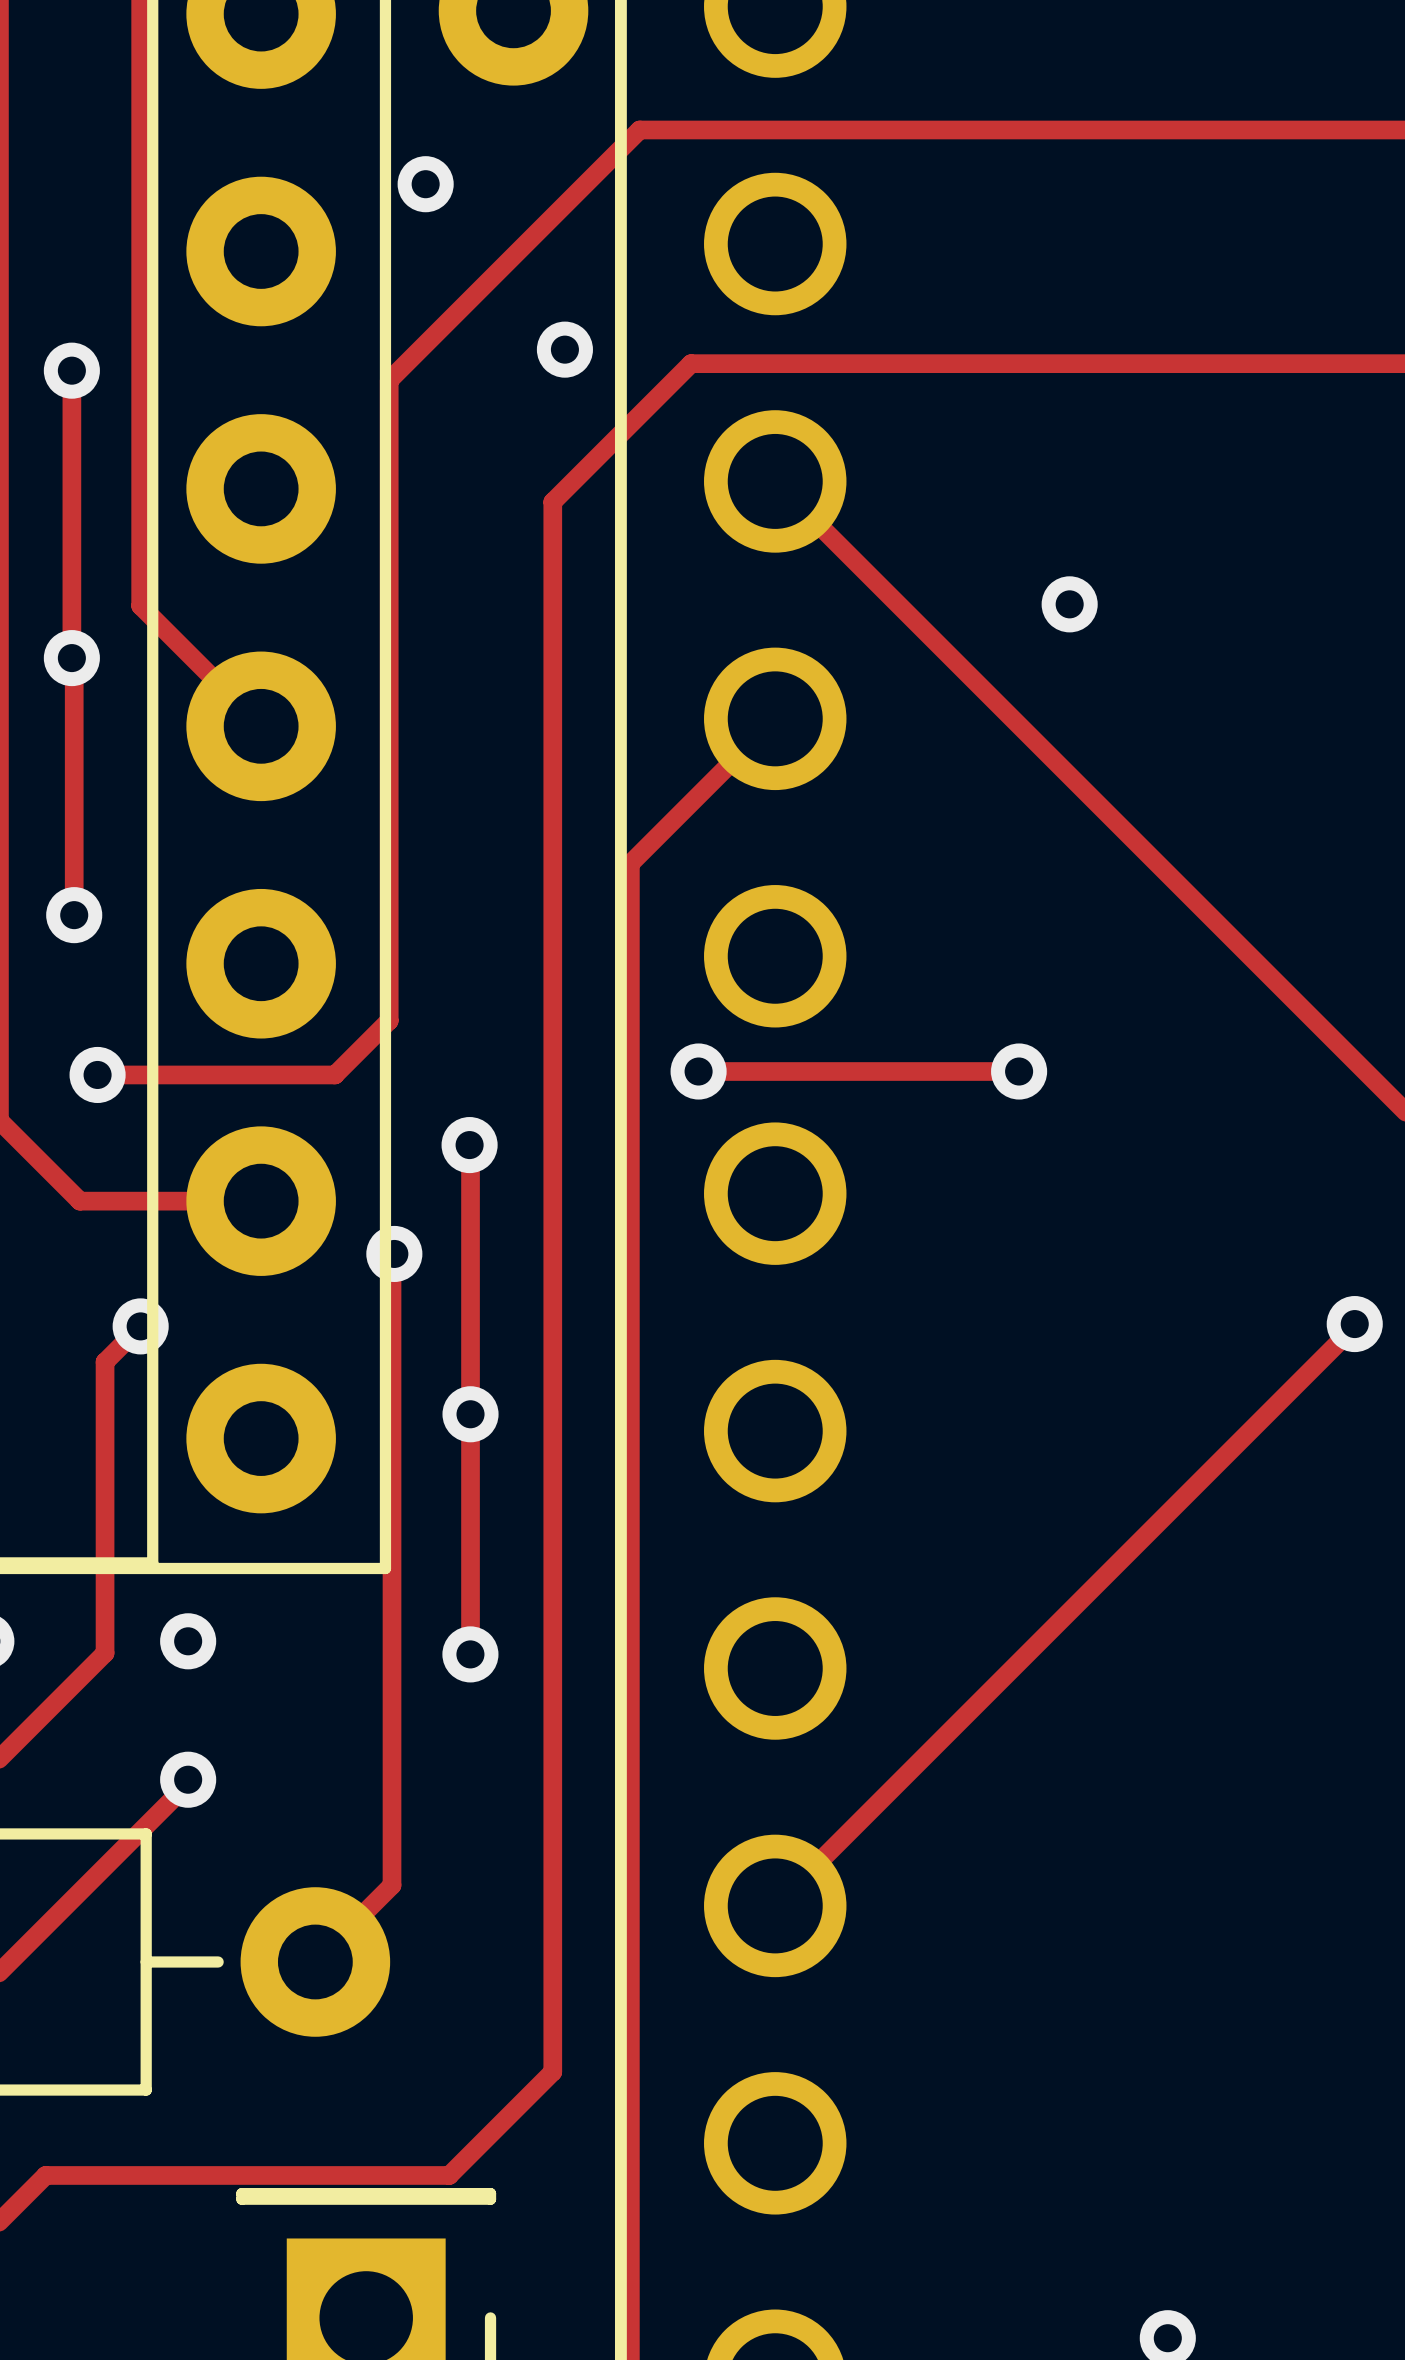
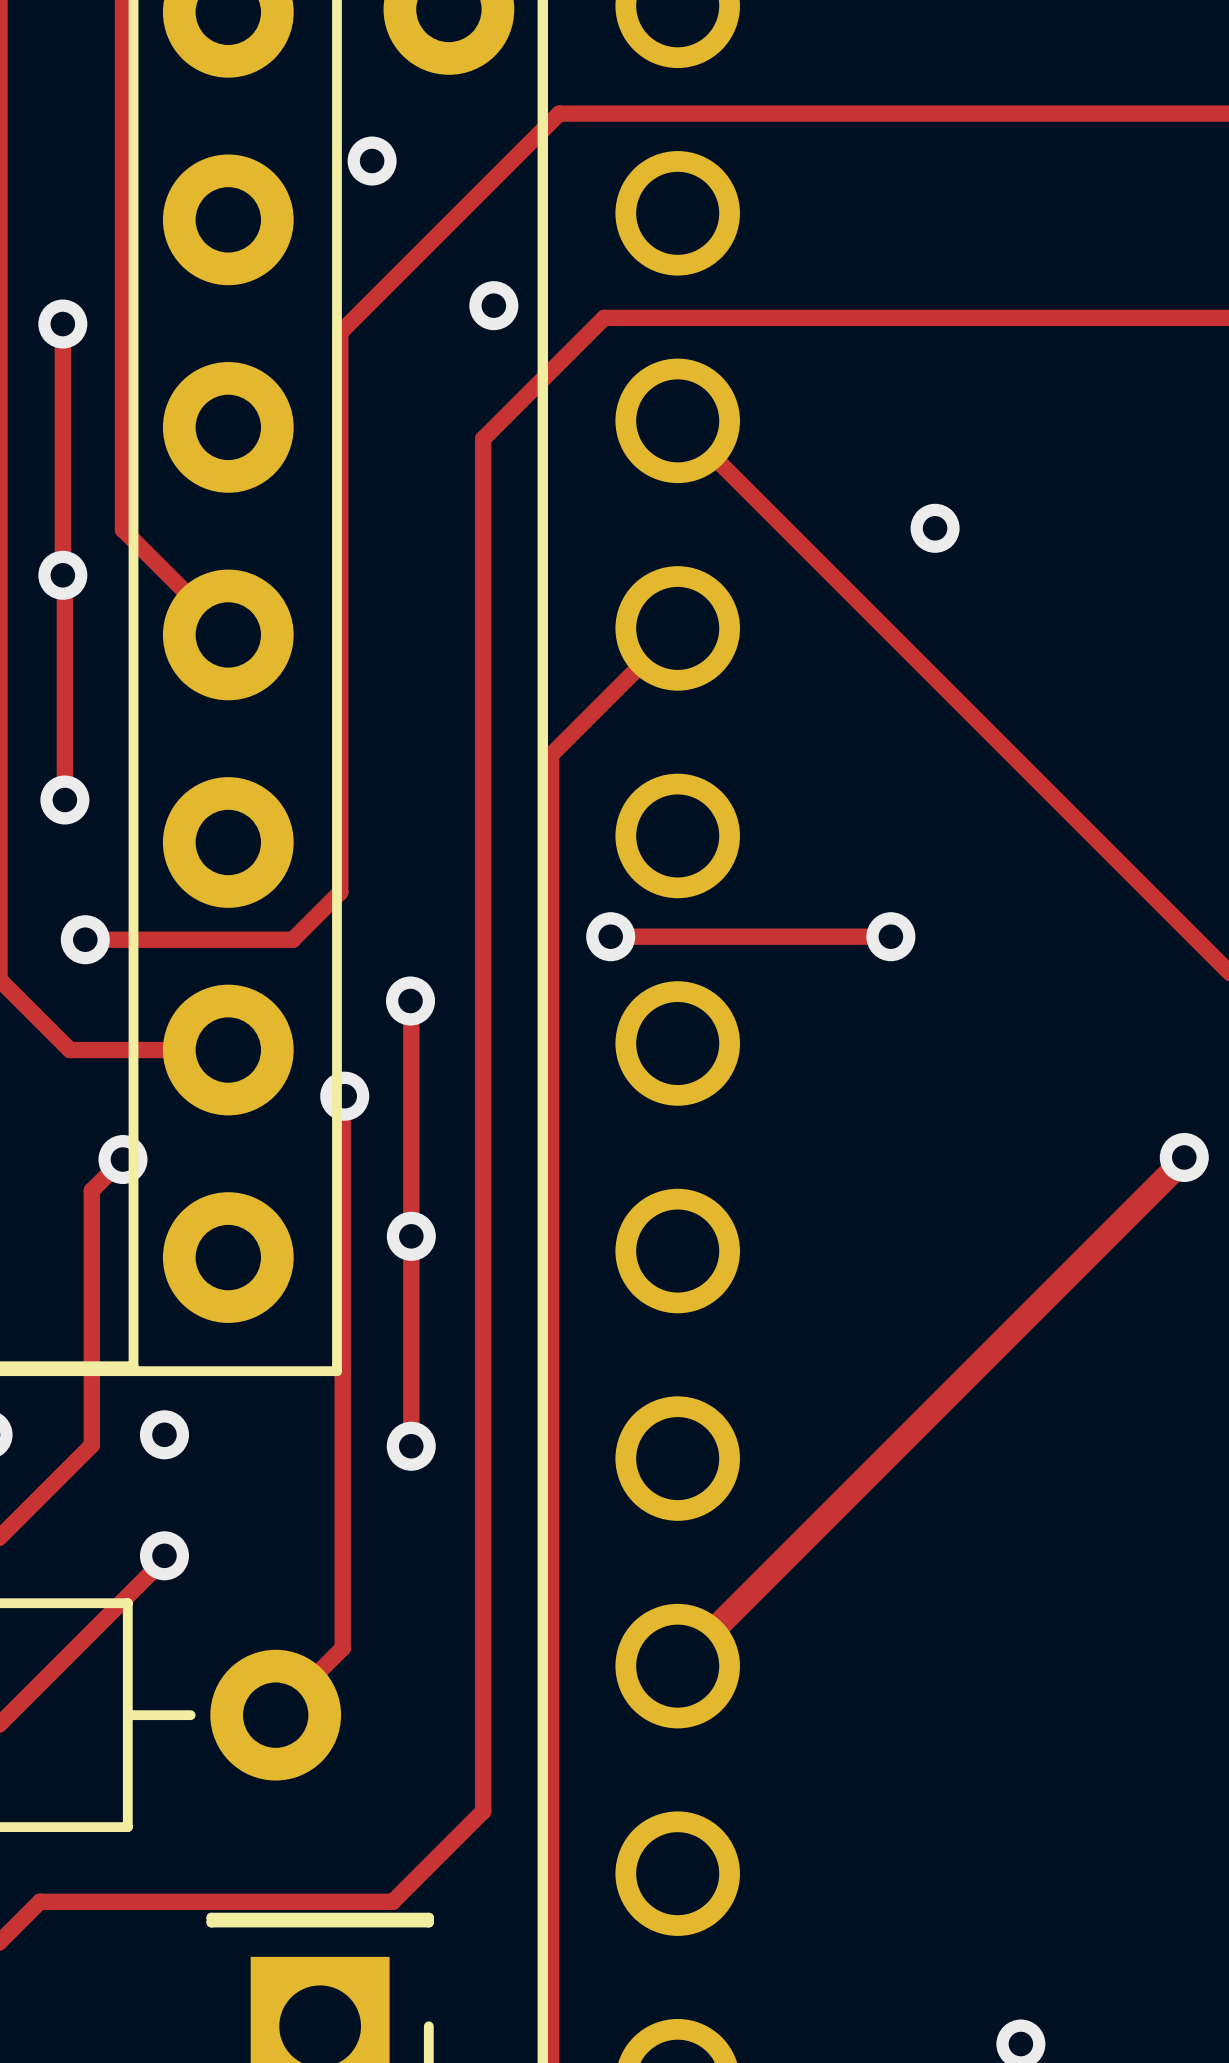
track width: thin (1354, 1326) (775, 1905) -> thick (1184, 1159) (677, 1666)

